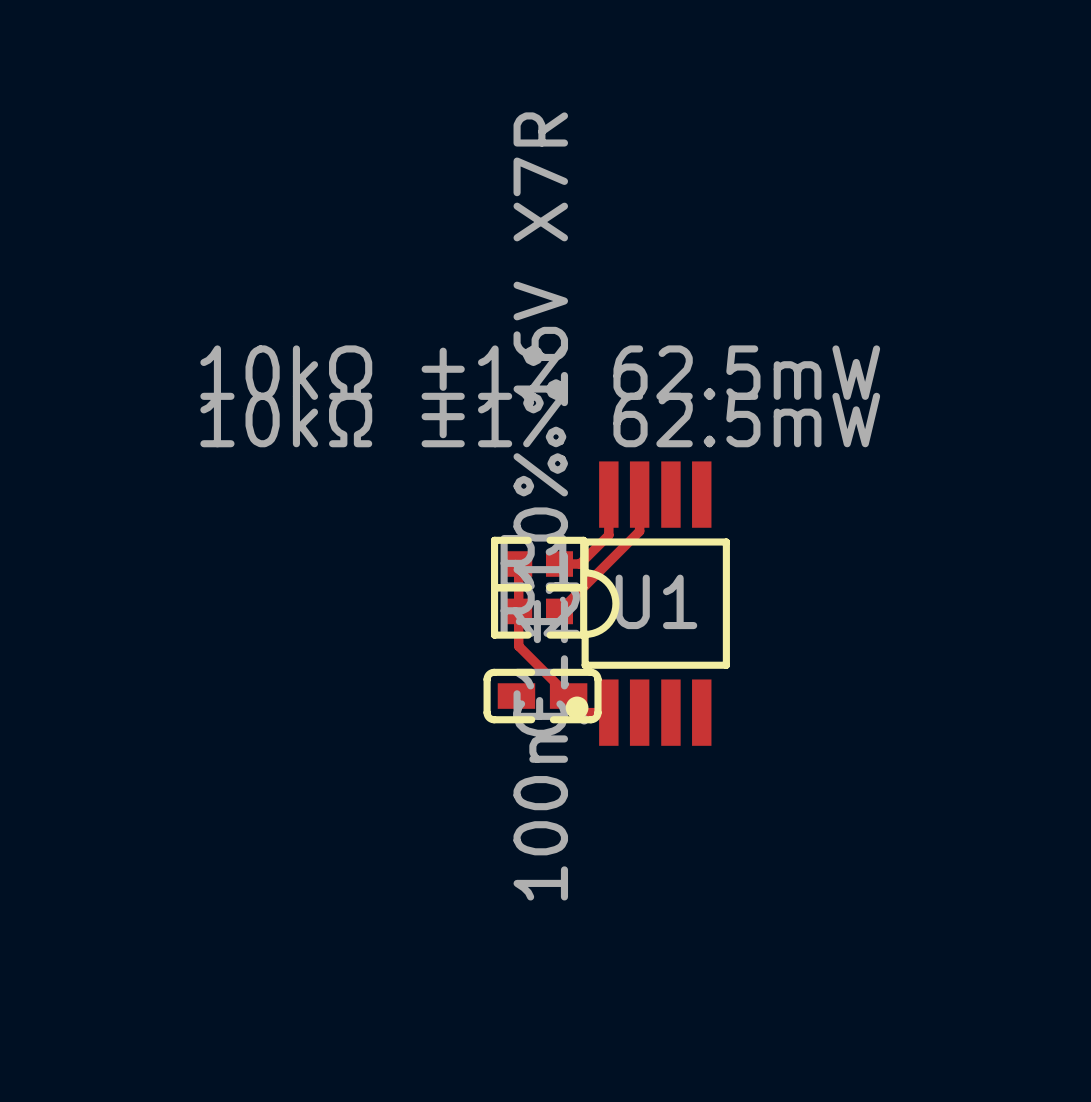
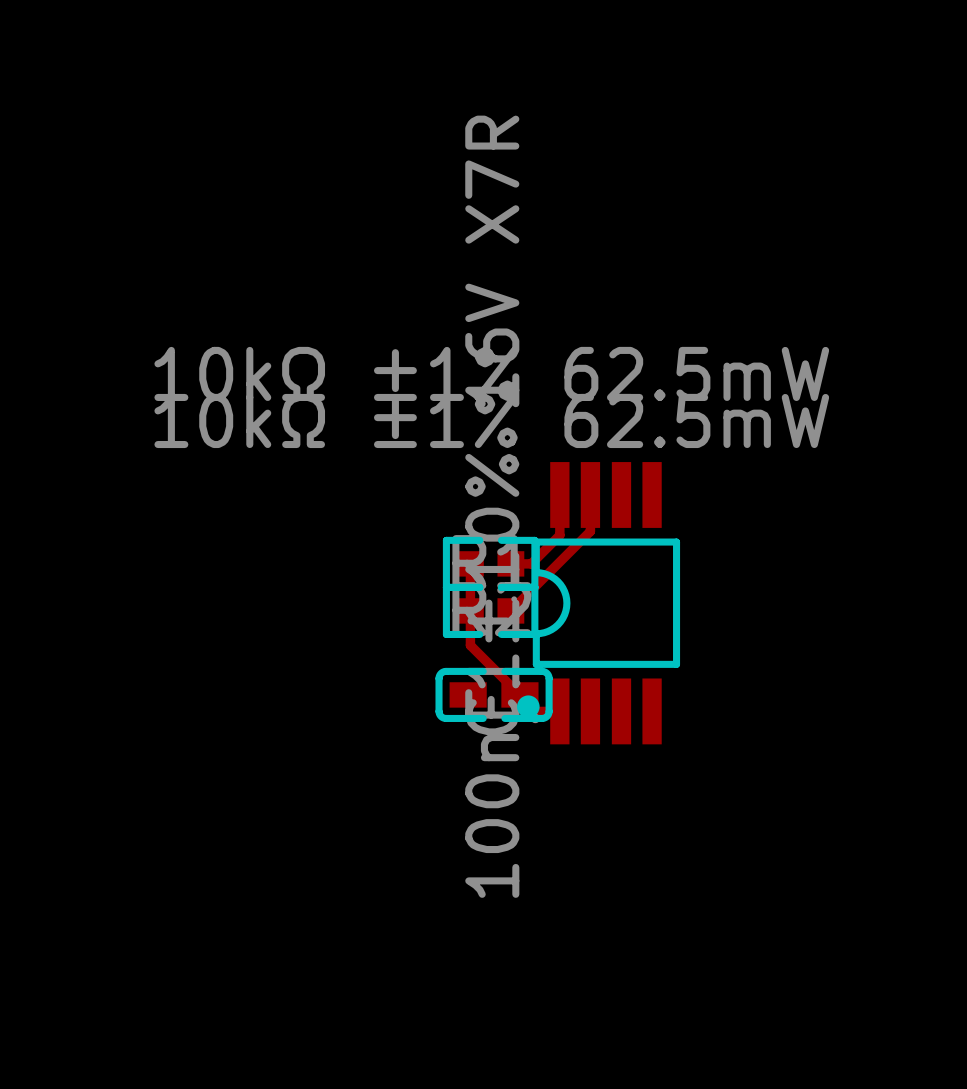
U1 name: U1 (656, 601) -> none

